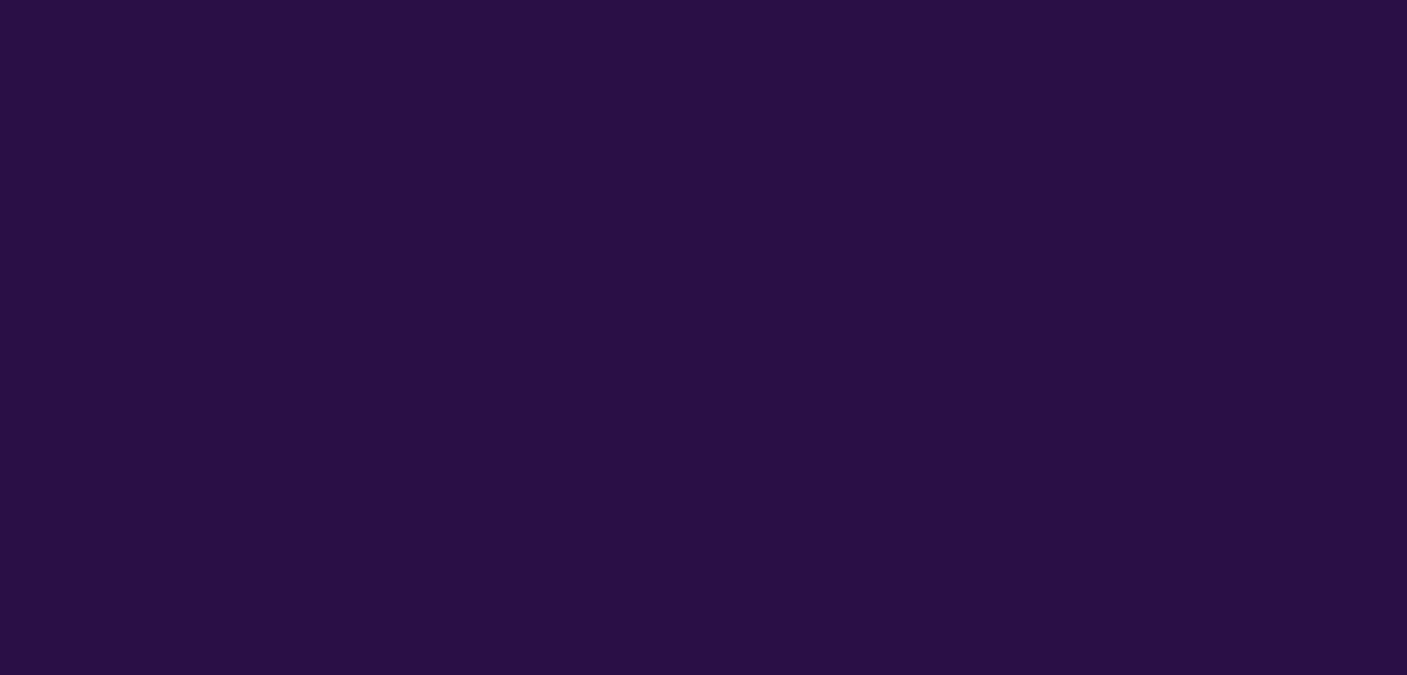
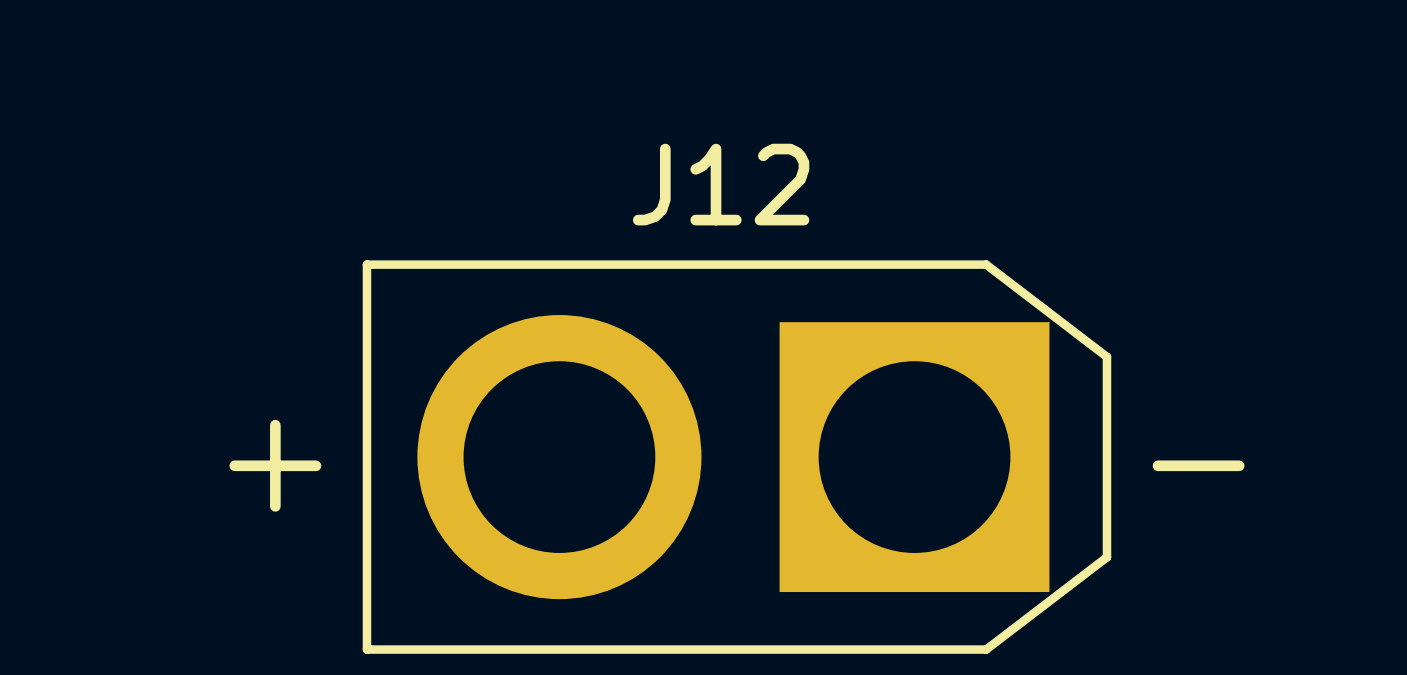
J12: none -> (736, 457)

